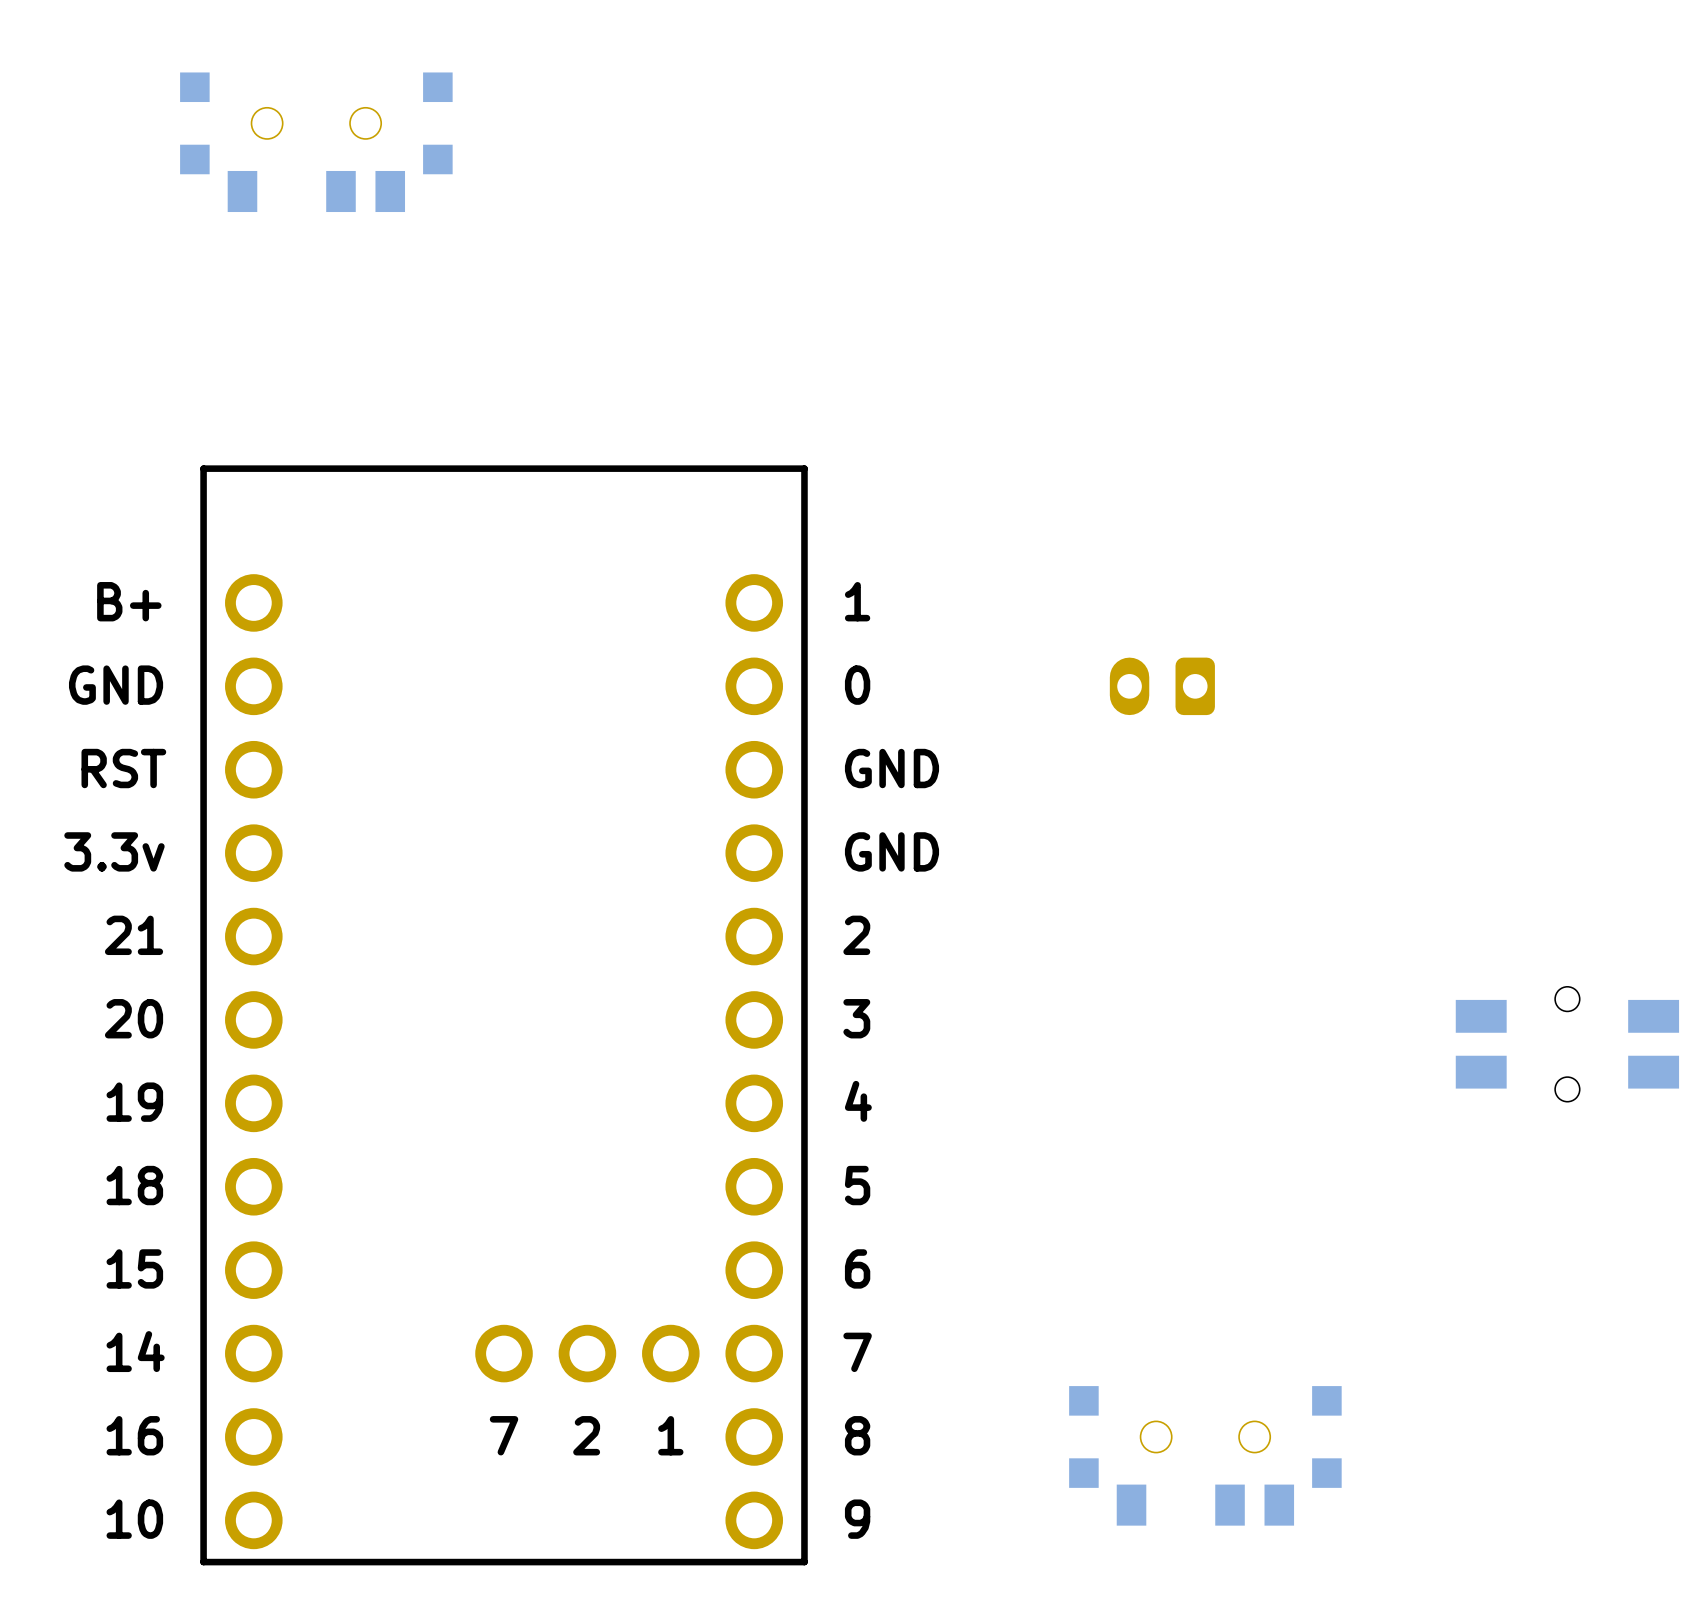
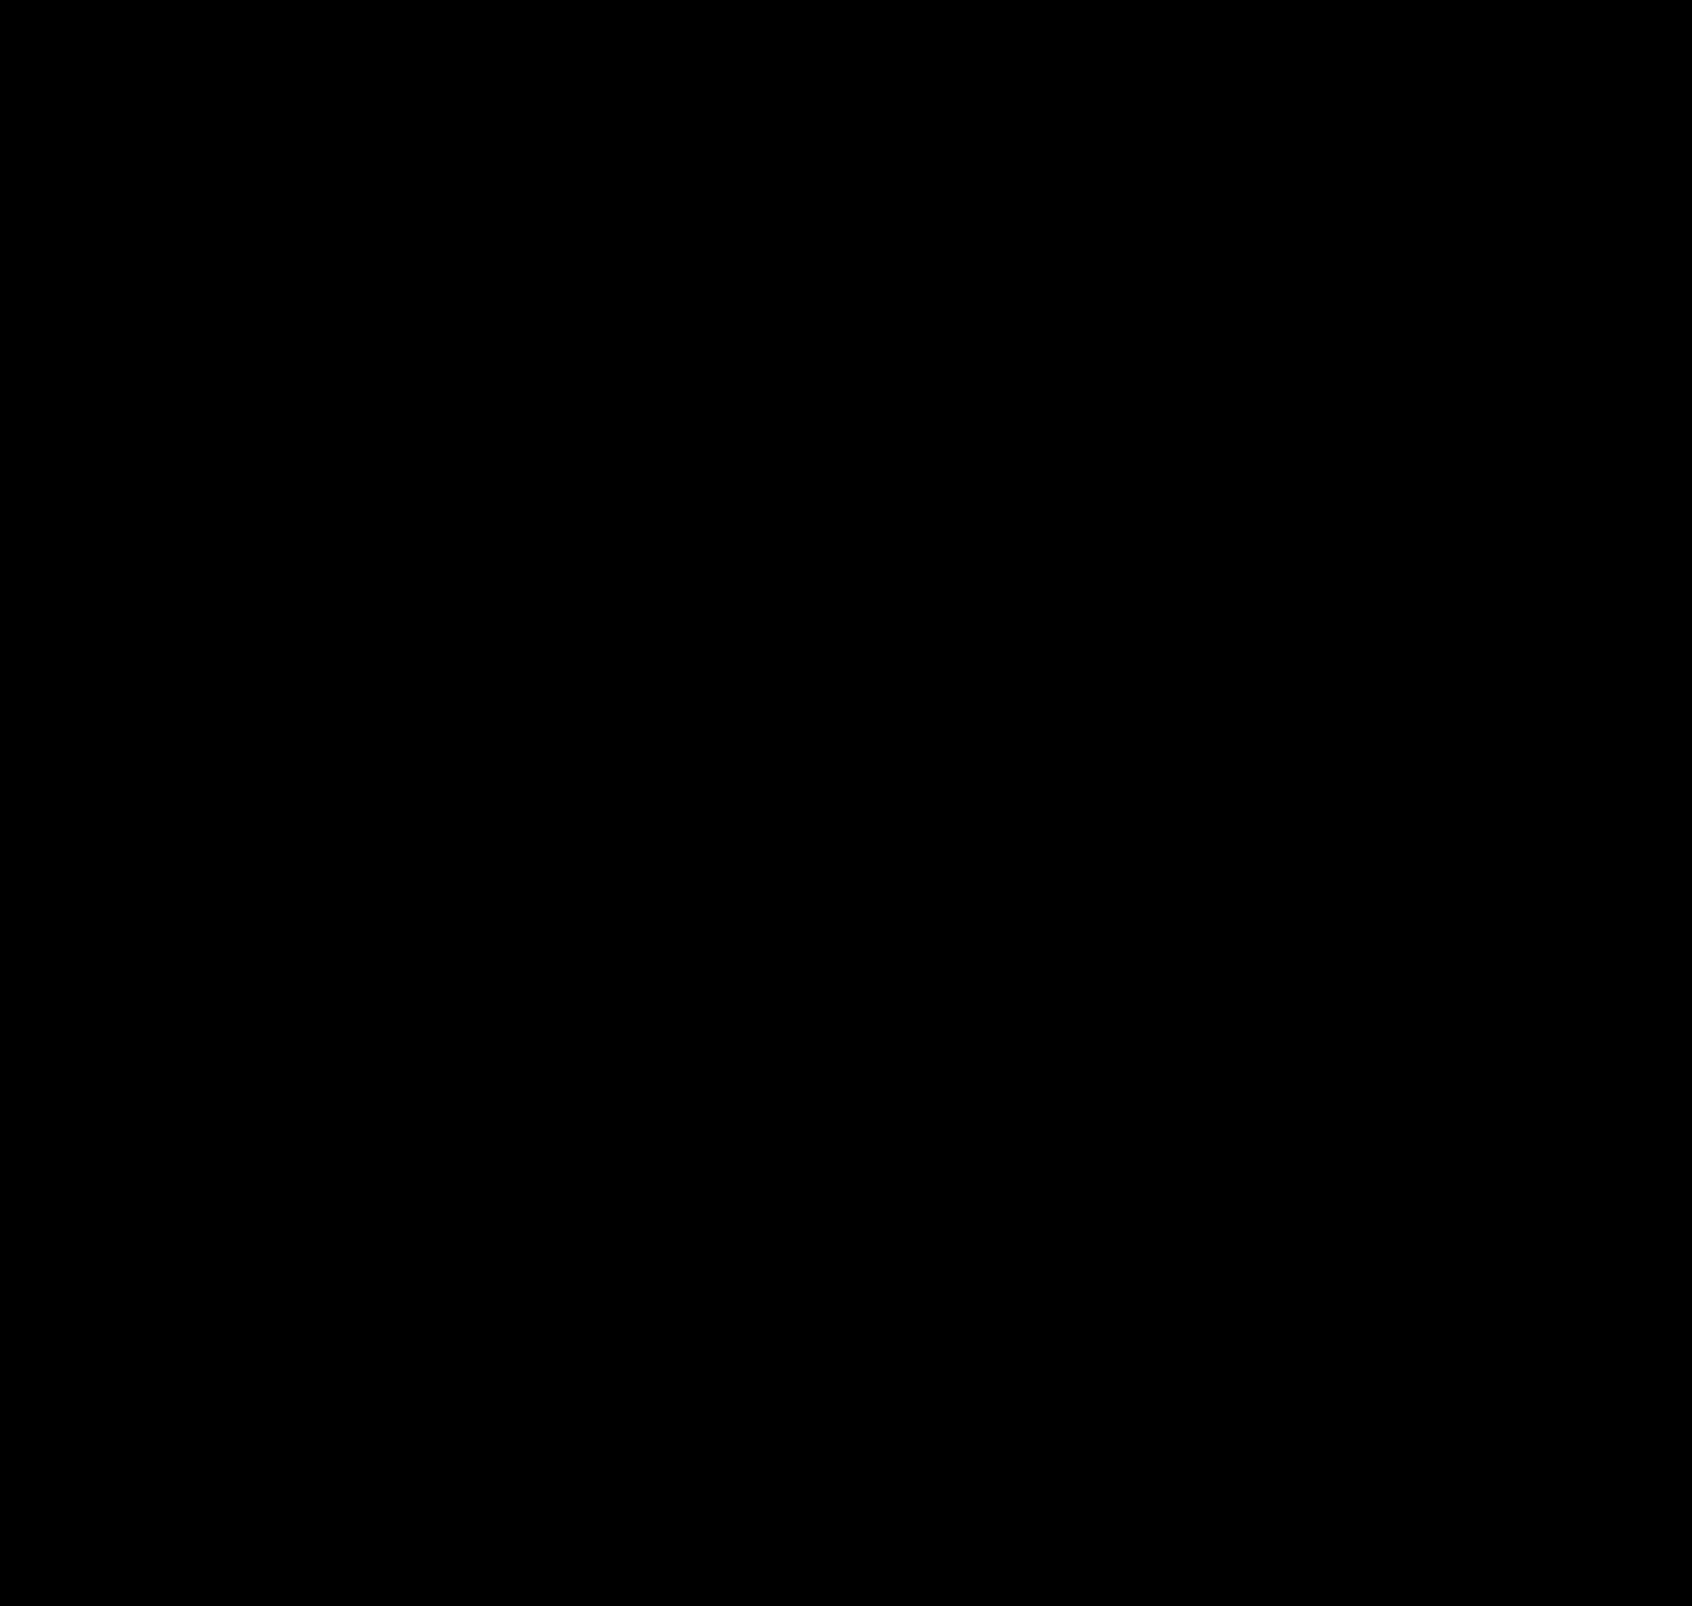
part: (316, 142) -> none
part: (1162, 686) -> none
part: (504, 1015) -> none
part: (1567, 1044) -> none
part: (1205, 1455) -> none

